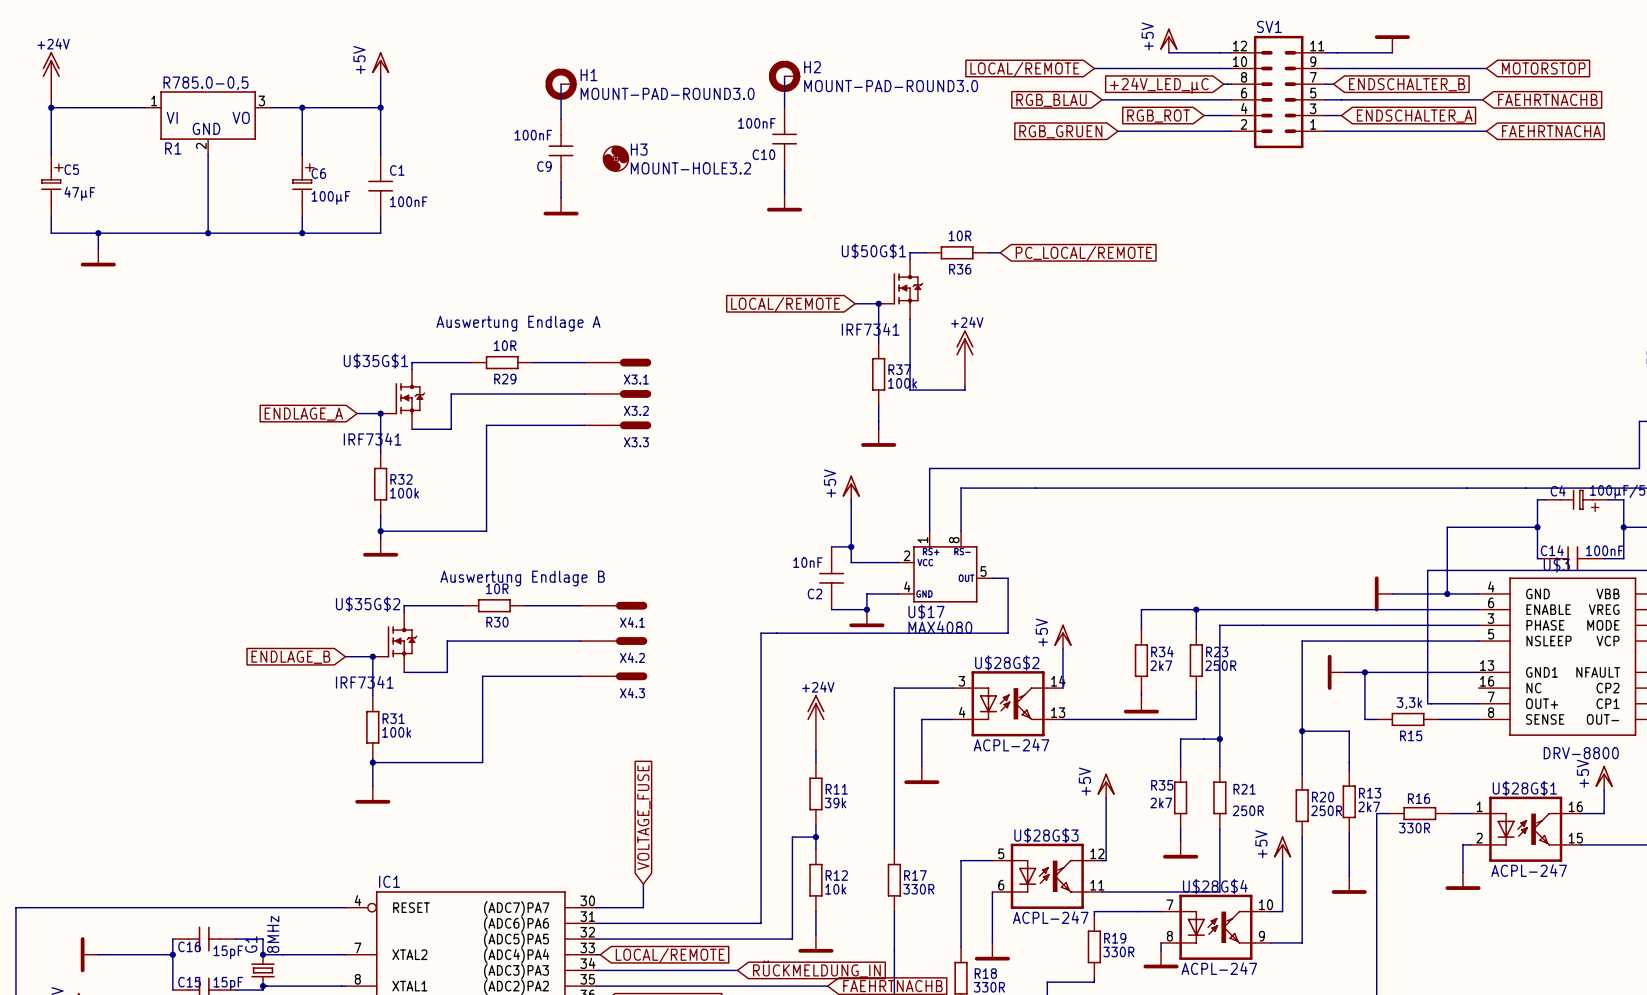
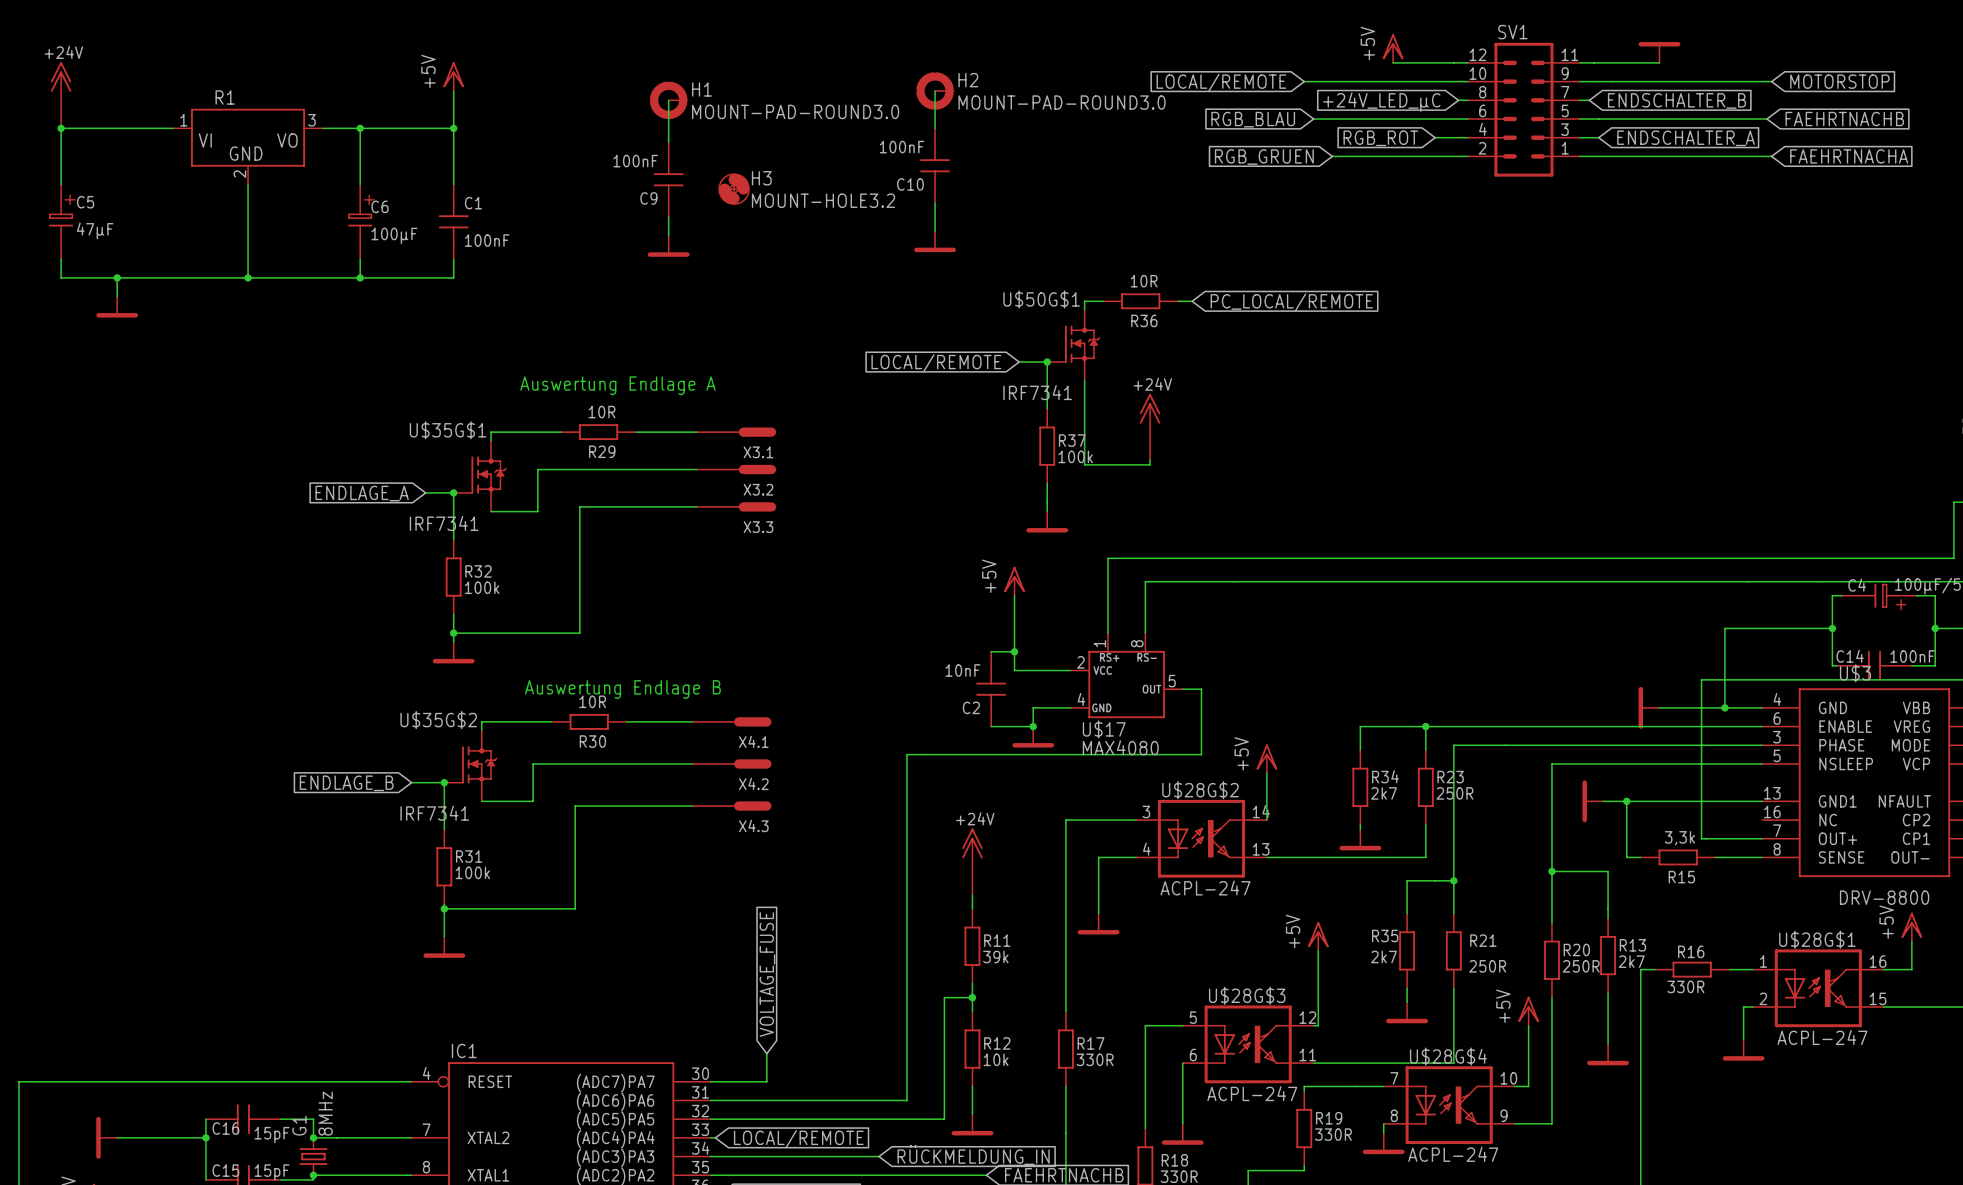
R1 value: R785.0-0,5 (206, 83) -> none
R1 name position: R1 (173, 148) -> R1 (225, 97)

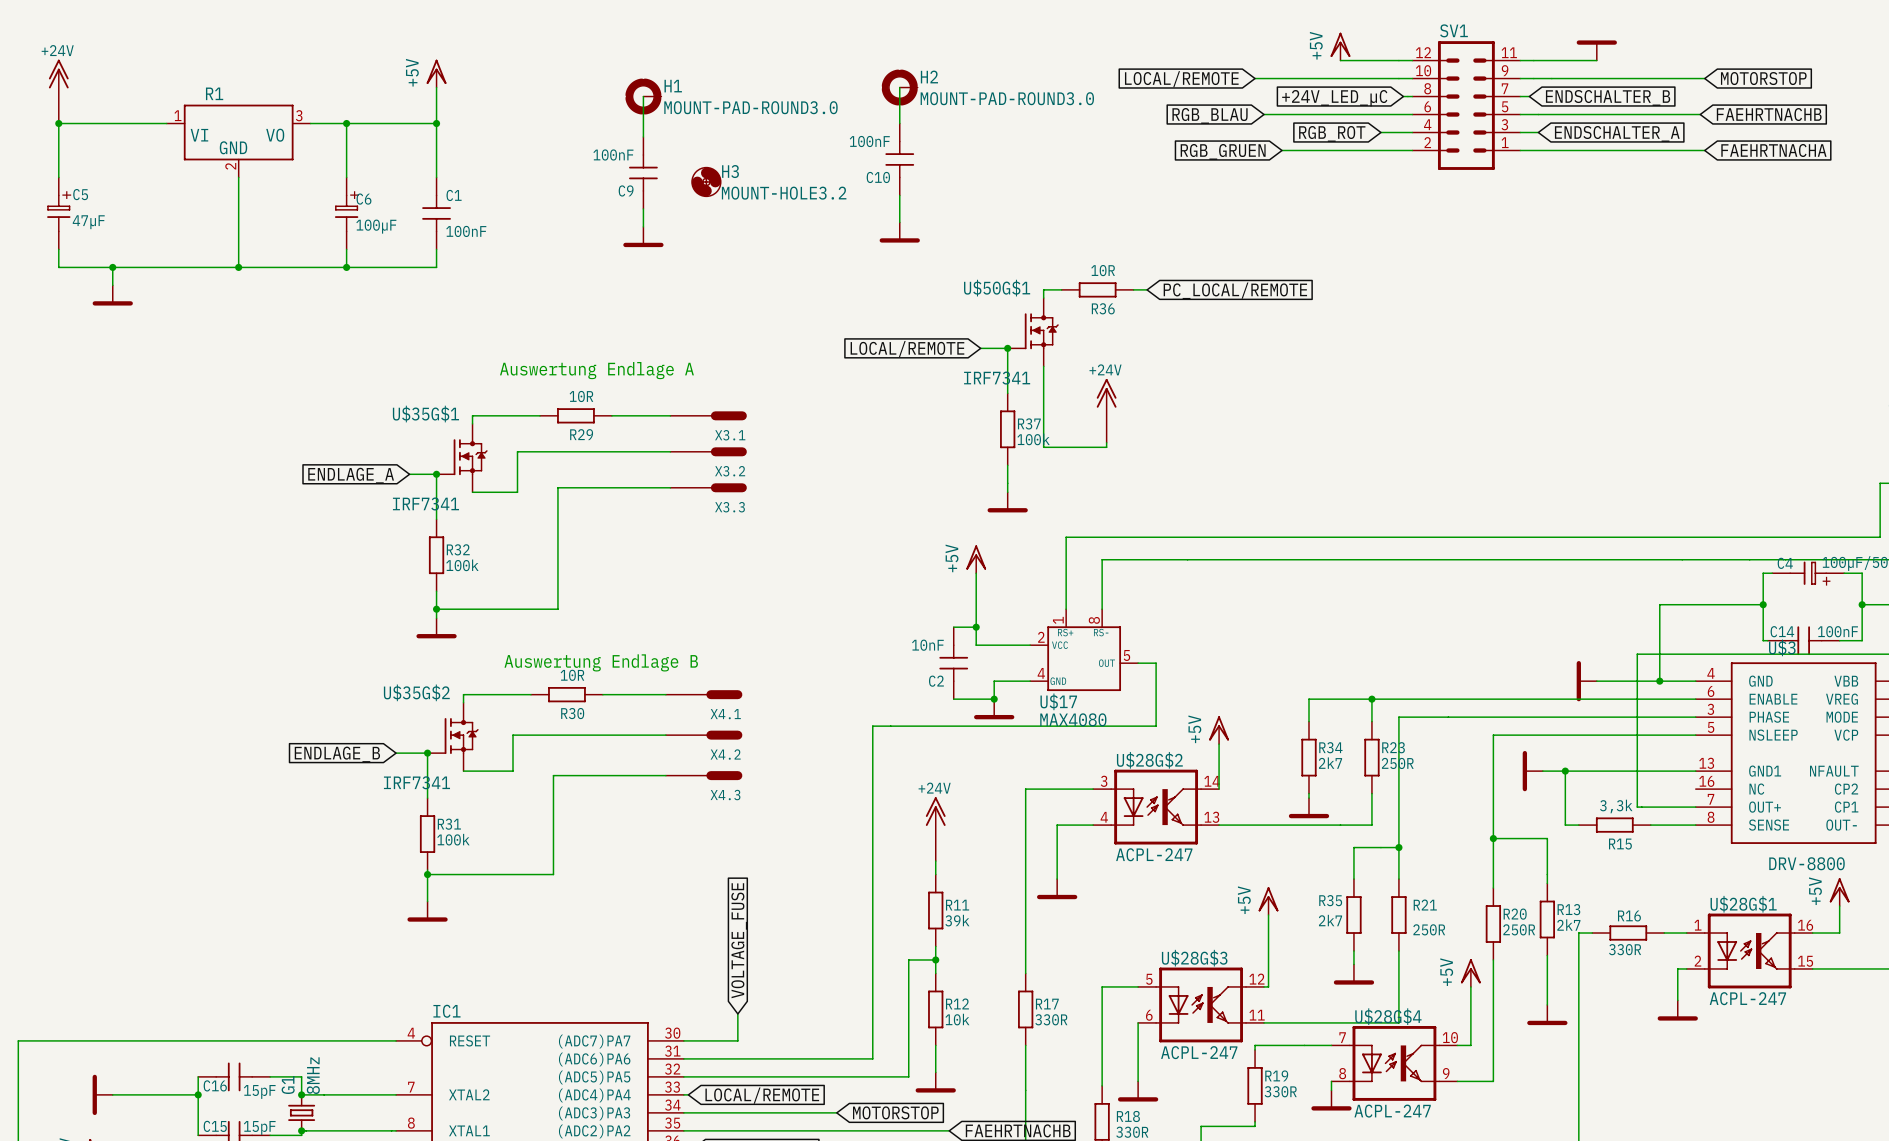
global label: RÜCKMELDUNG_IN (973, 1155) -> none
wire: (869, 1156) (878, 1156) -> none
global label: none -> MOTORSTOP (895, 1112)

